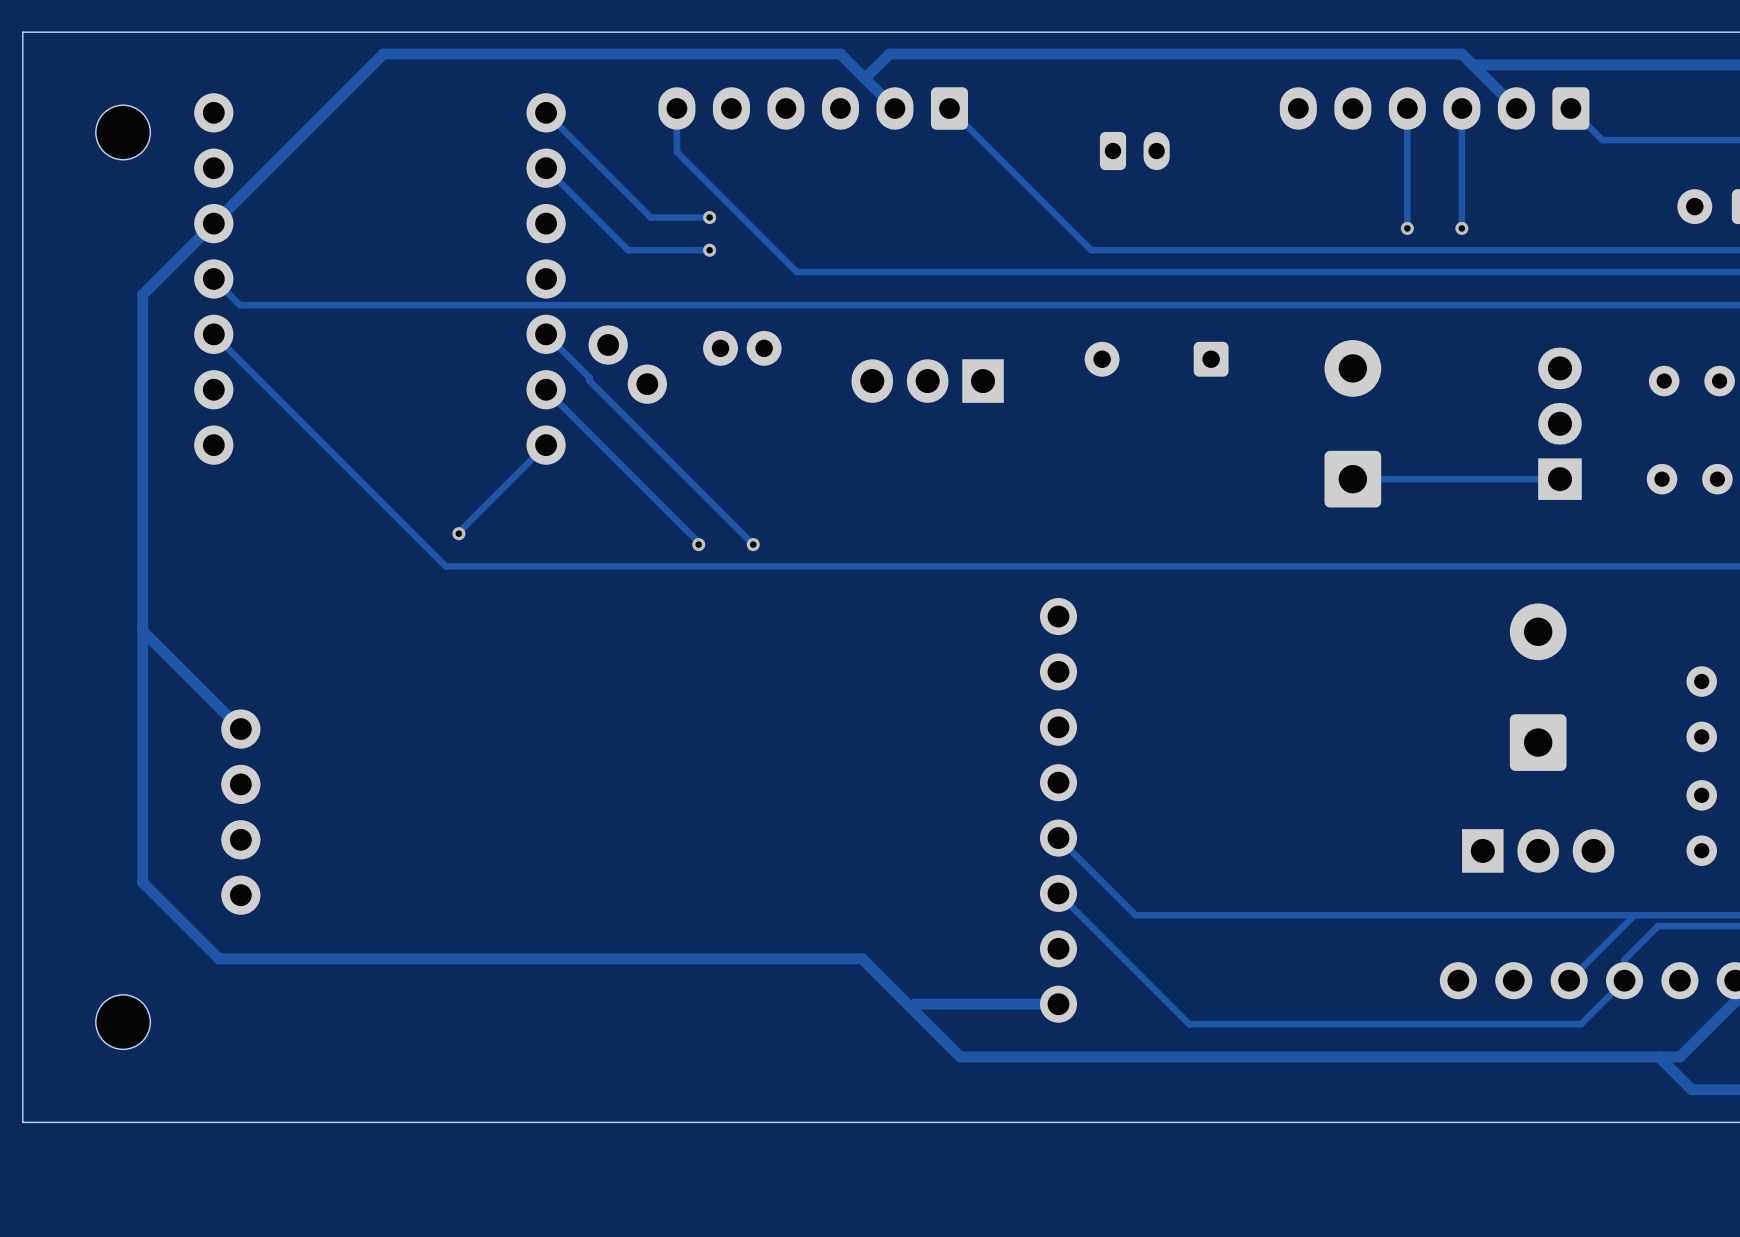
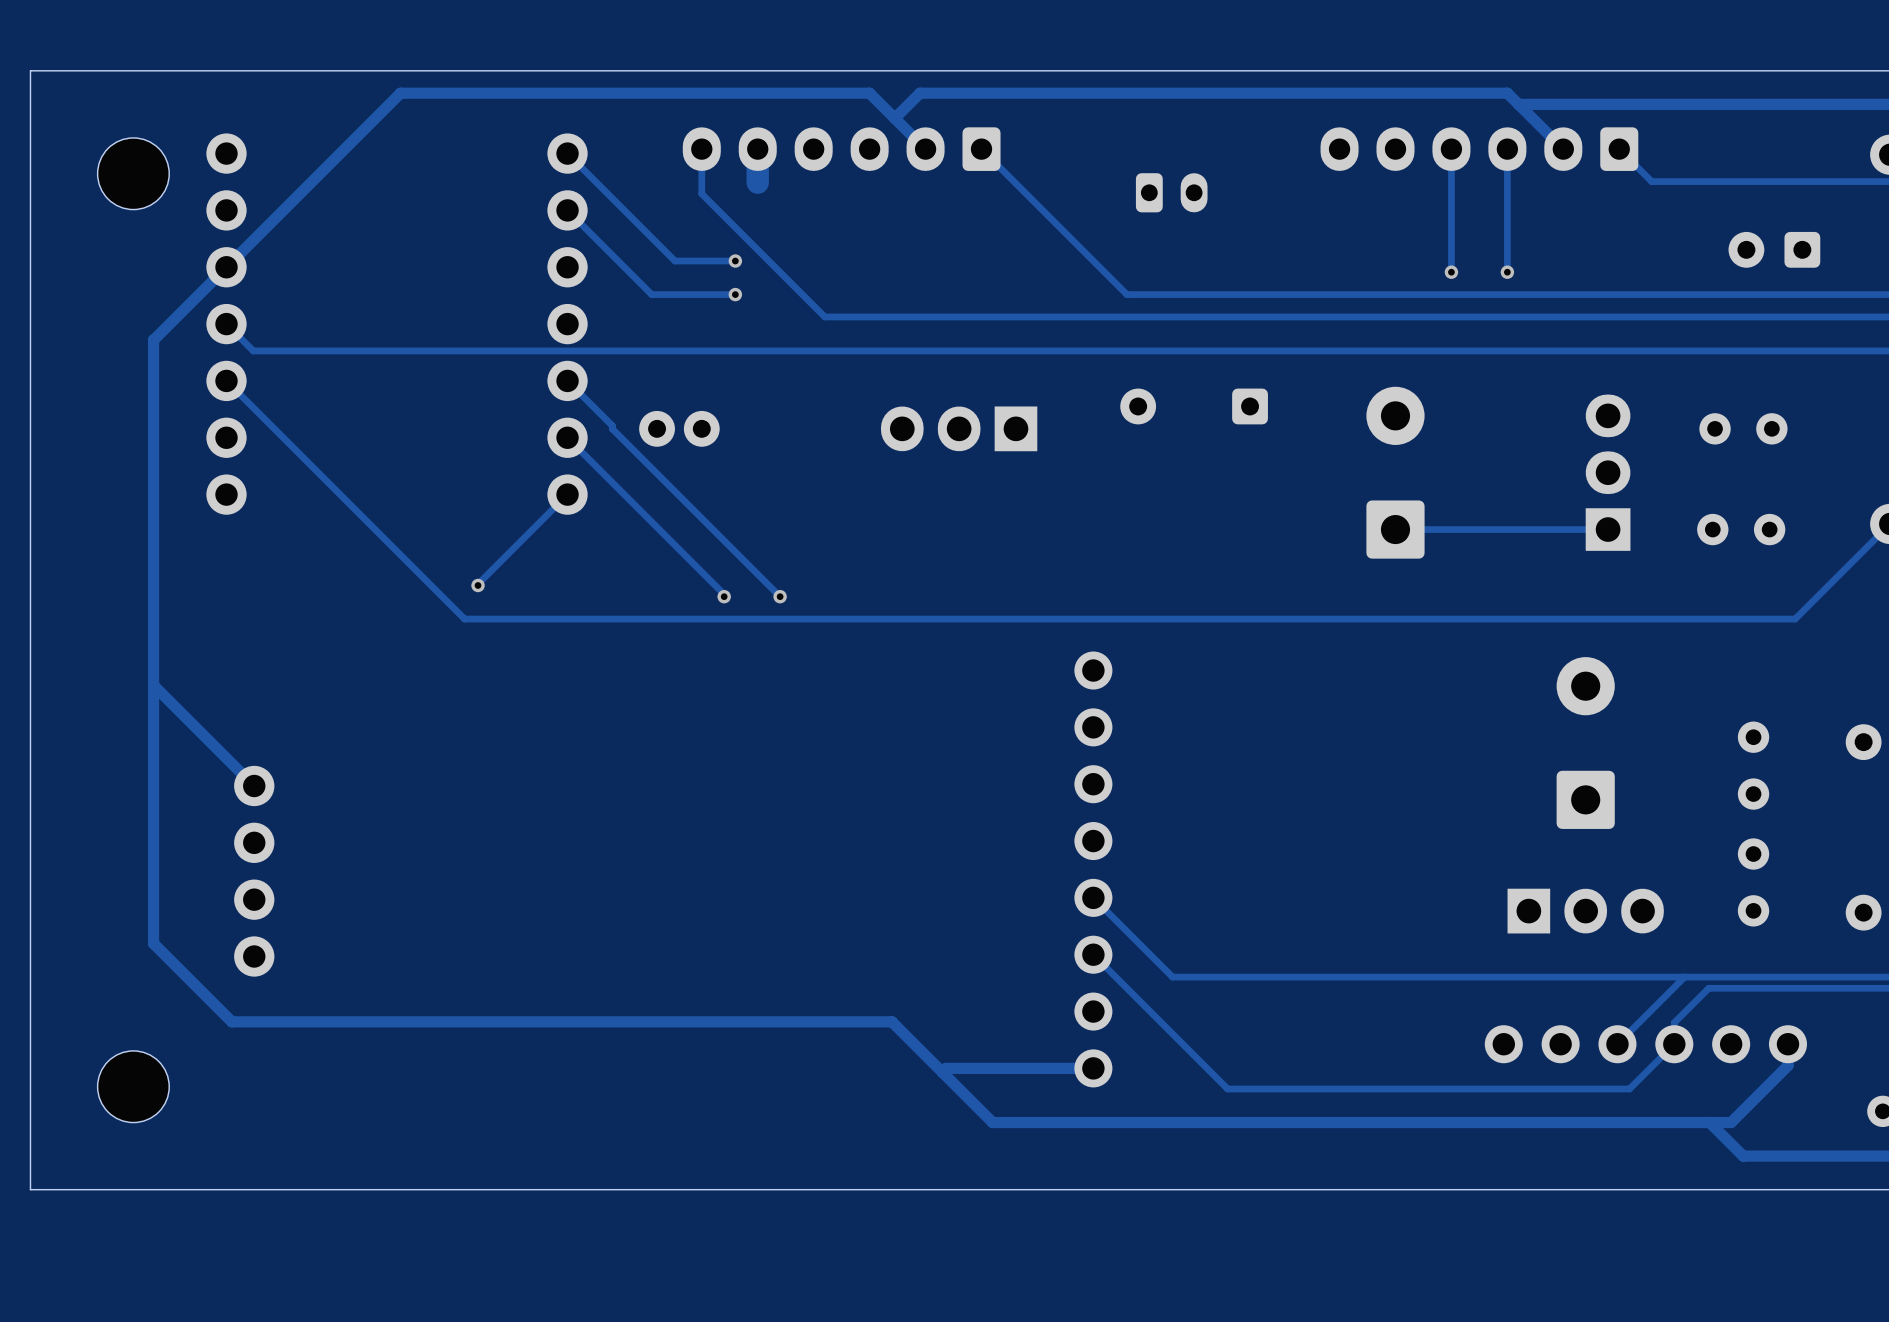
part footprint: [95, 105, 151, 160] -> [97, 137, 170, 210]
track: none -> (757, 149) (757, 182)
part position: (742, 348) -> (679, 428)
part: (627, 364) -> none
part footprint: [95, 994, 151, 1050] -> [97, 1050, 170, 1123]

